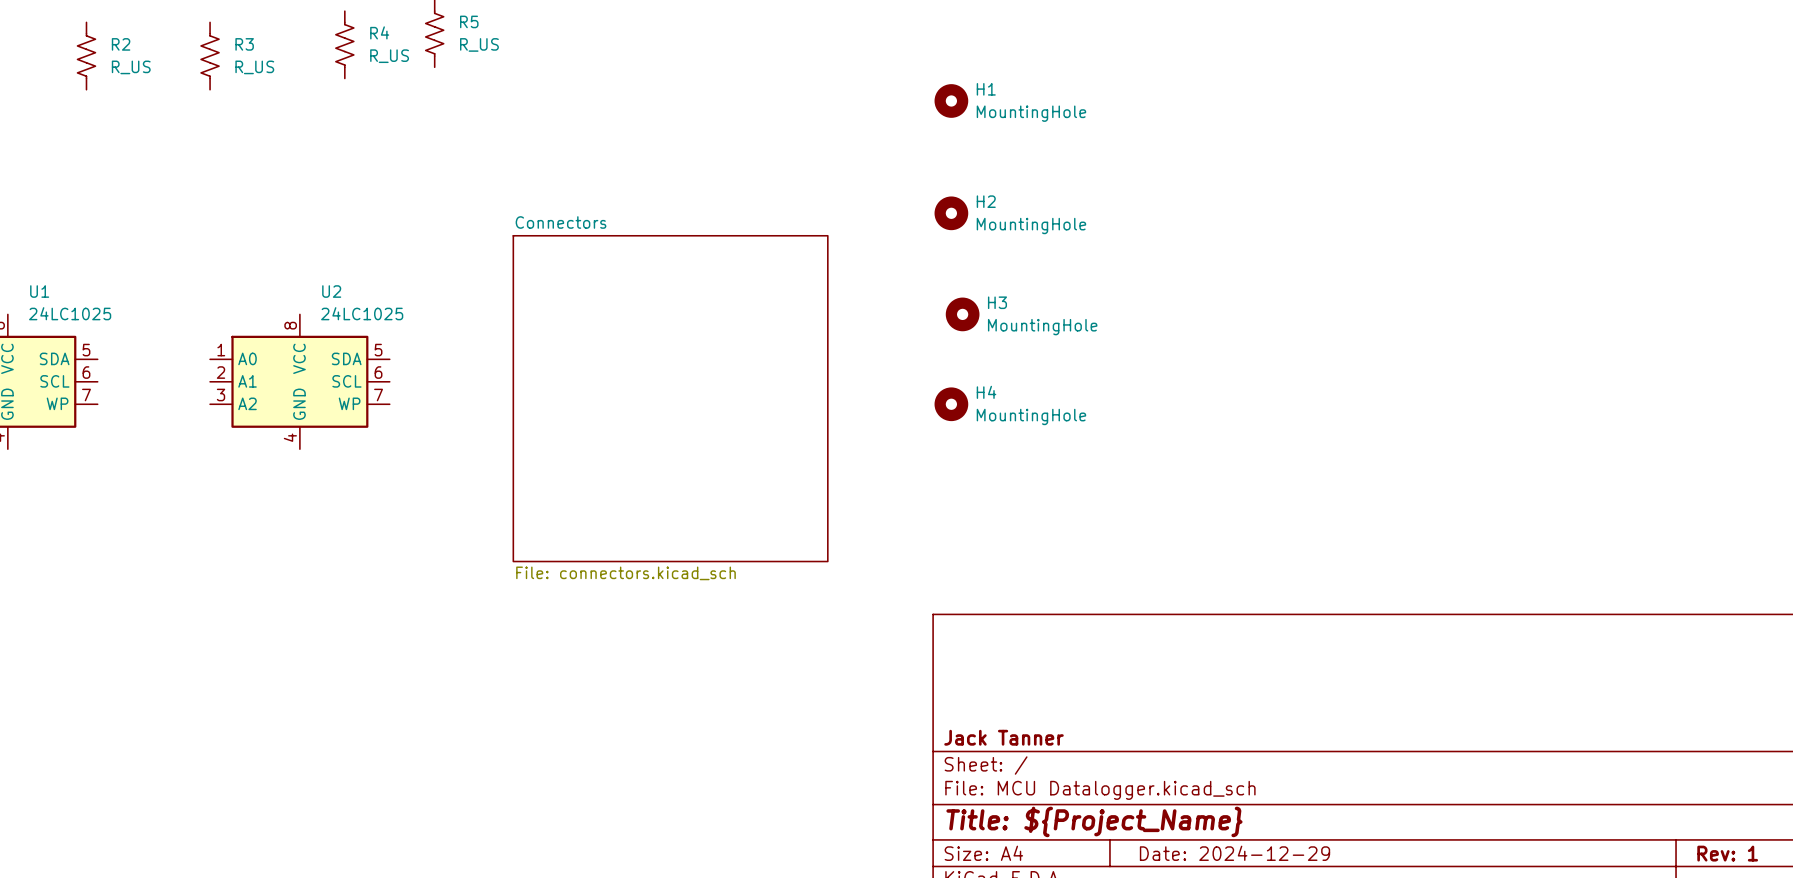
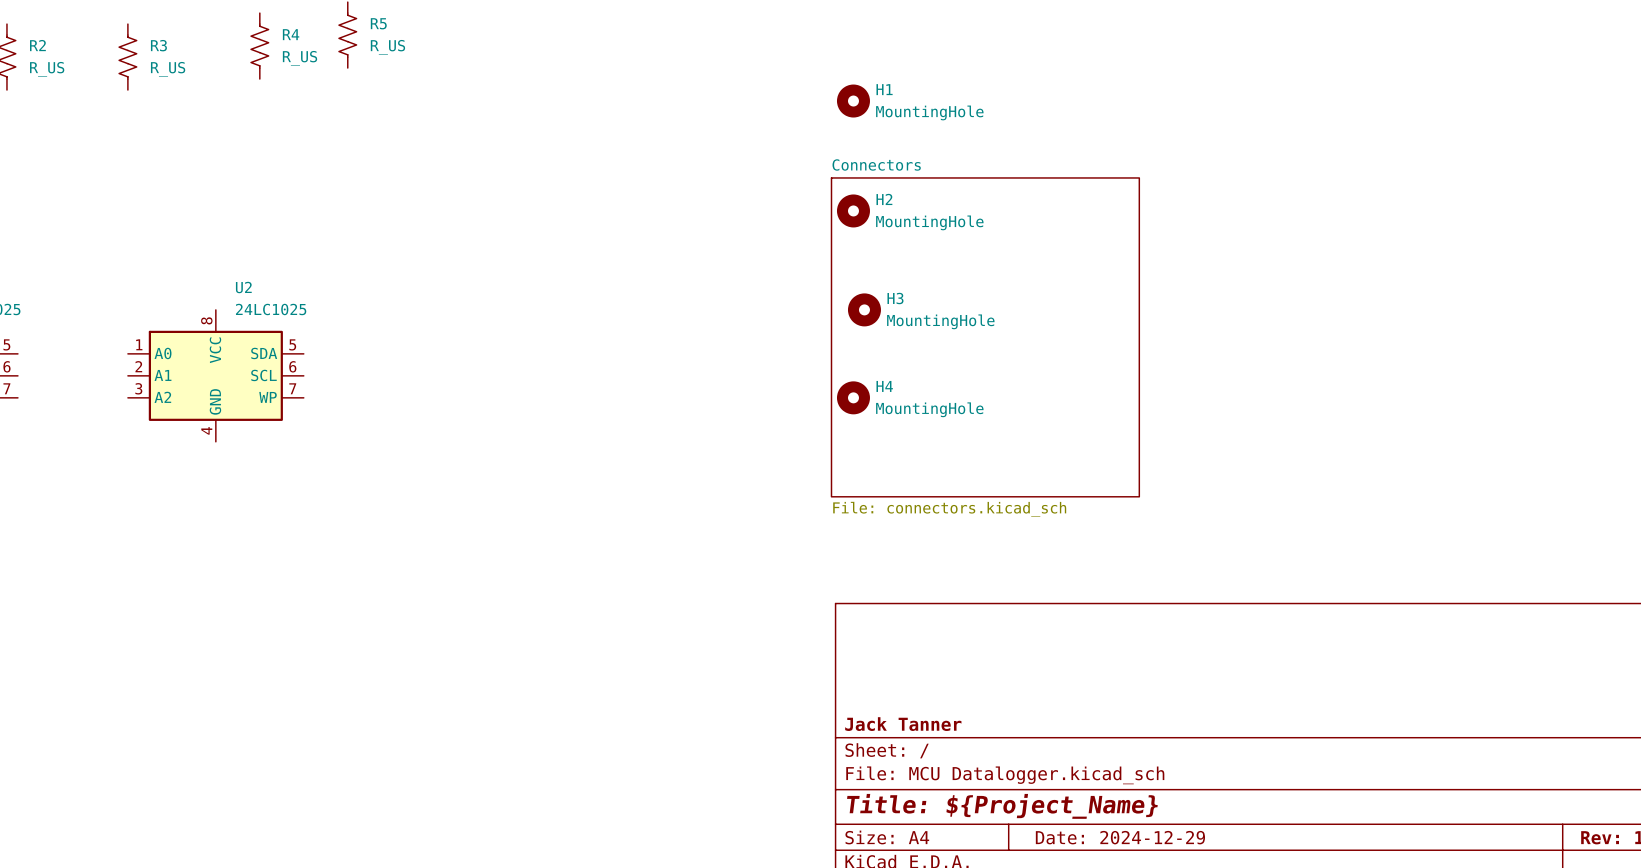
sheet Connectors: none -> File: connectors.kicad_sch (985, 337)
sheet Connectors: File: connectors.kicad_sch (670, 398) -> none

